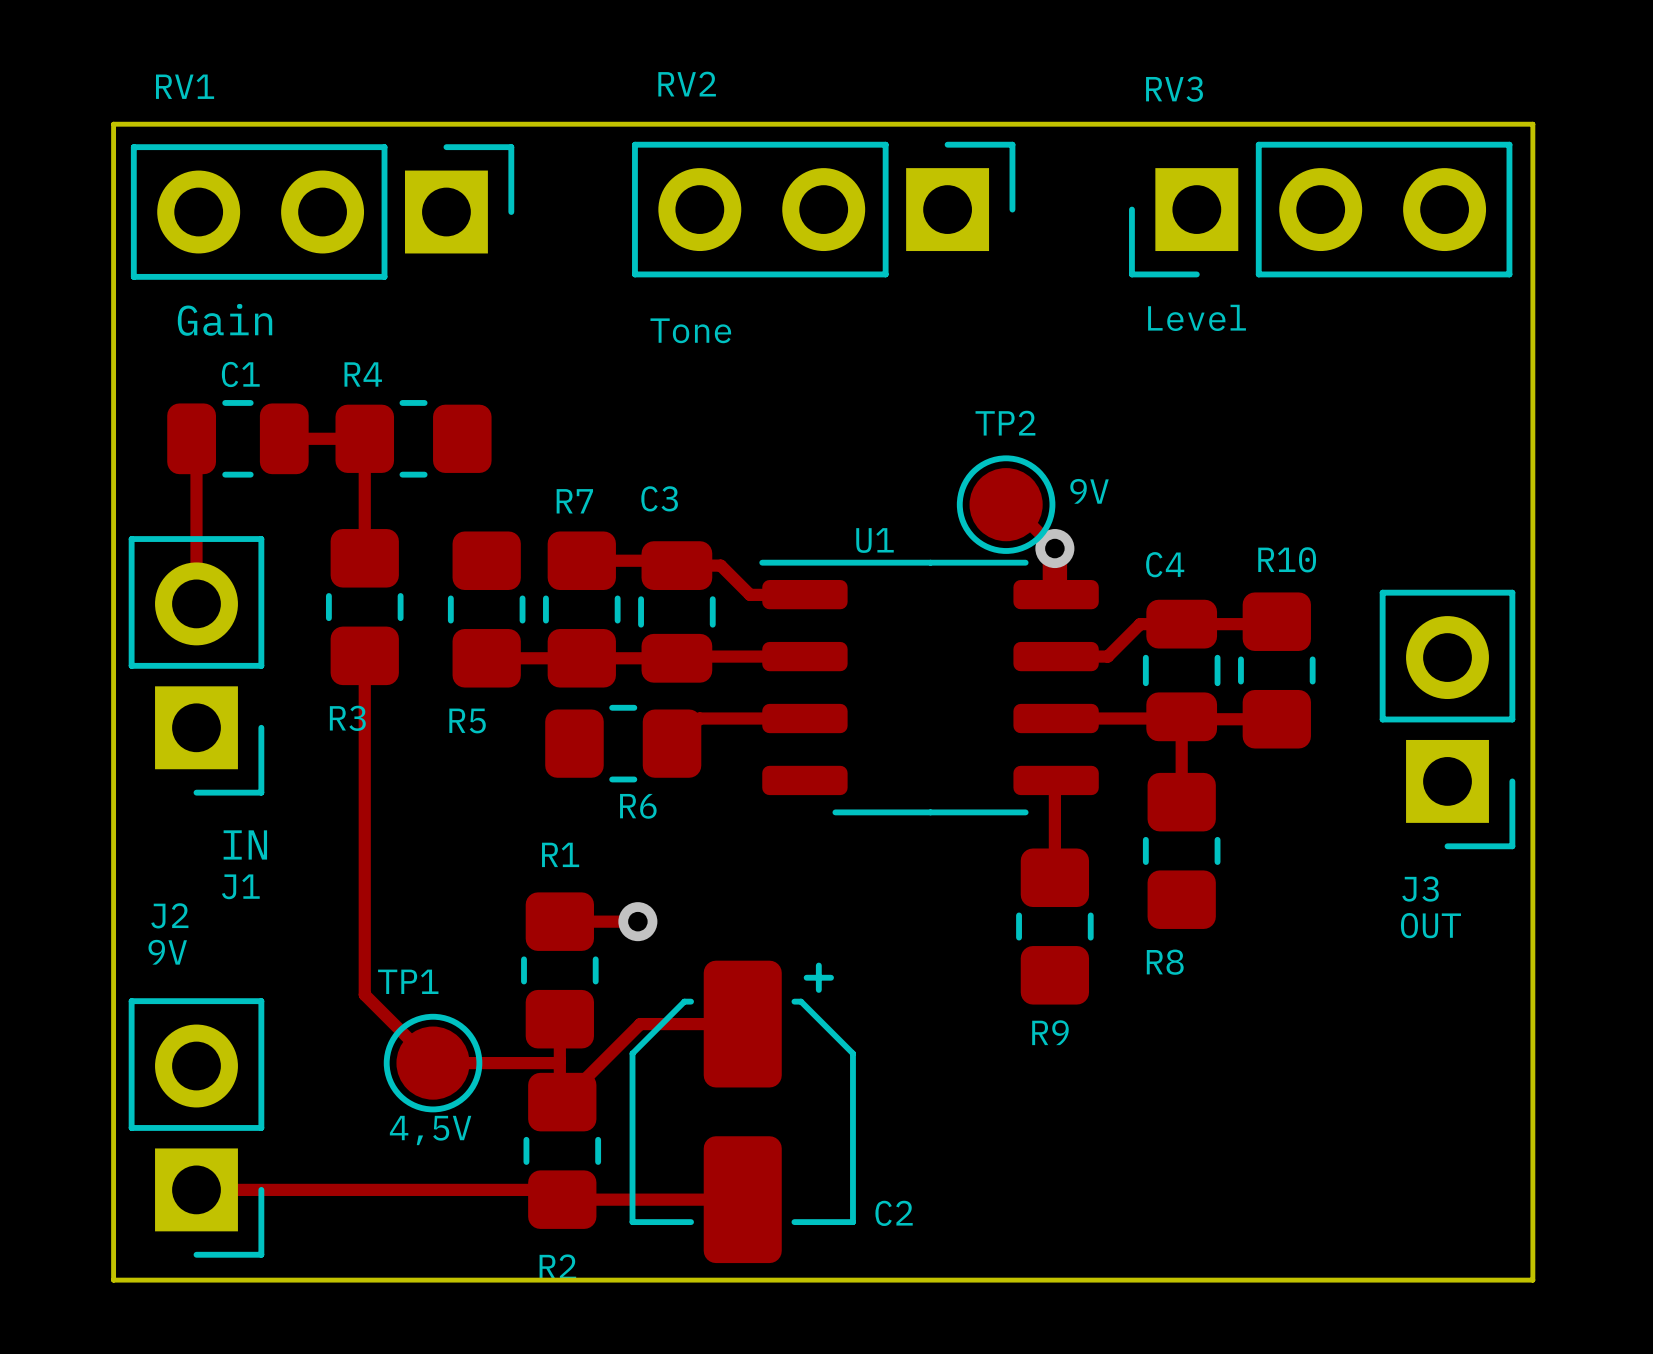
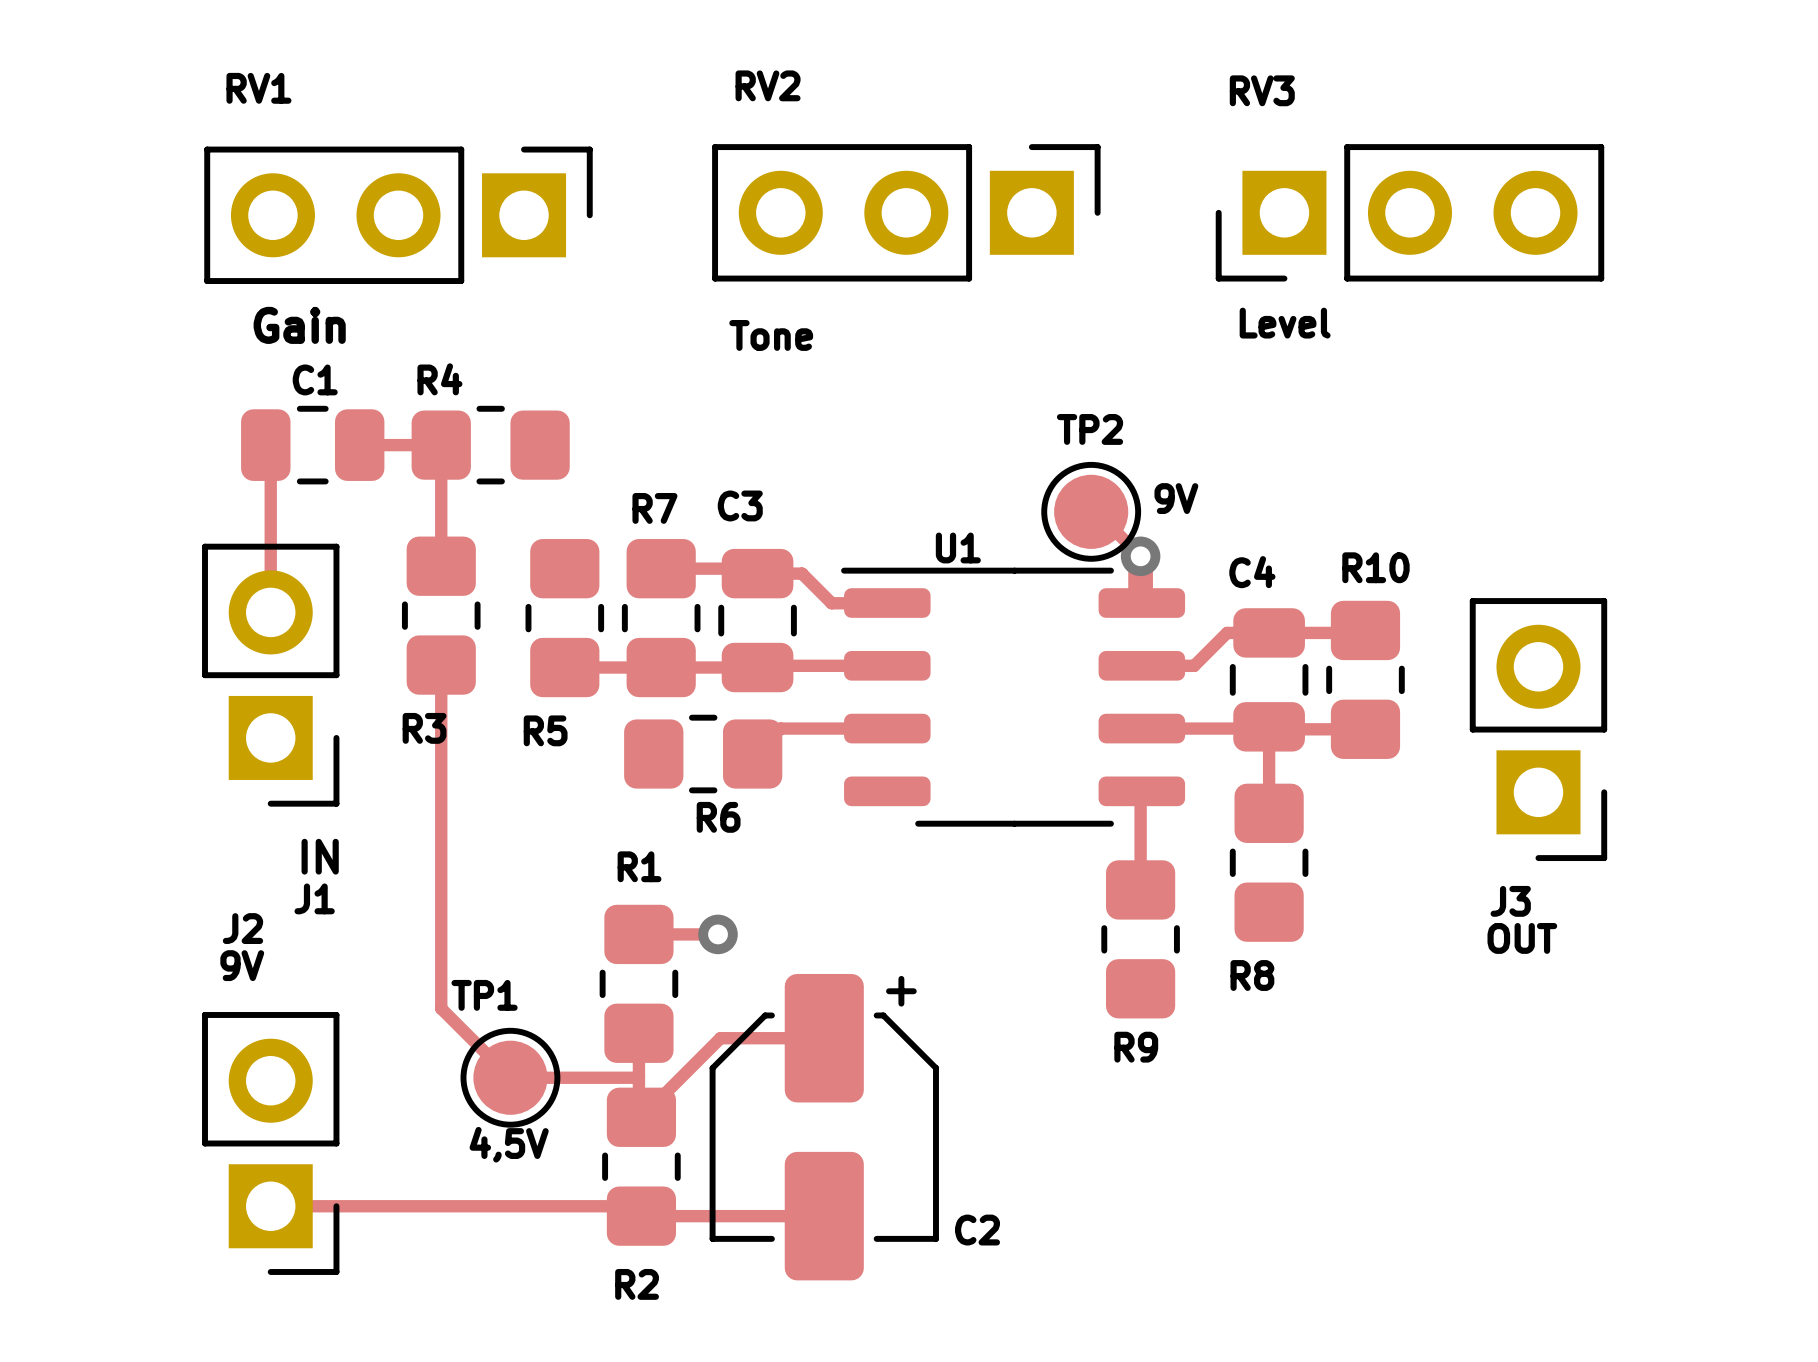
board edge: (113, 124) (1532, 124) (1532, 1280) (113, 1280) (113, 124) -> none

